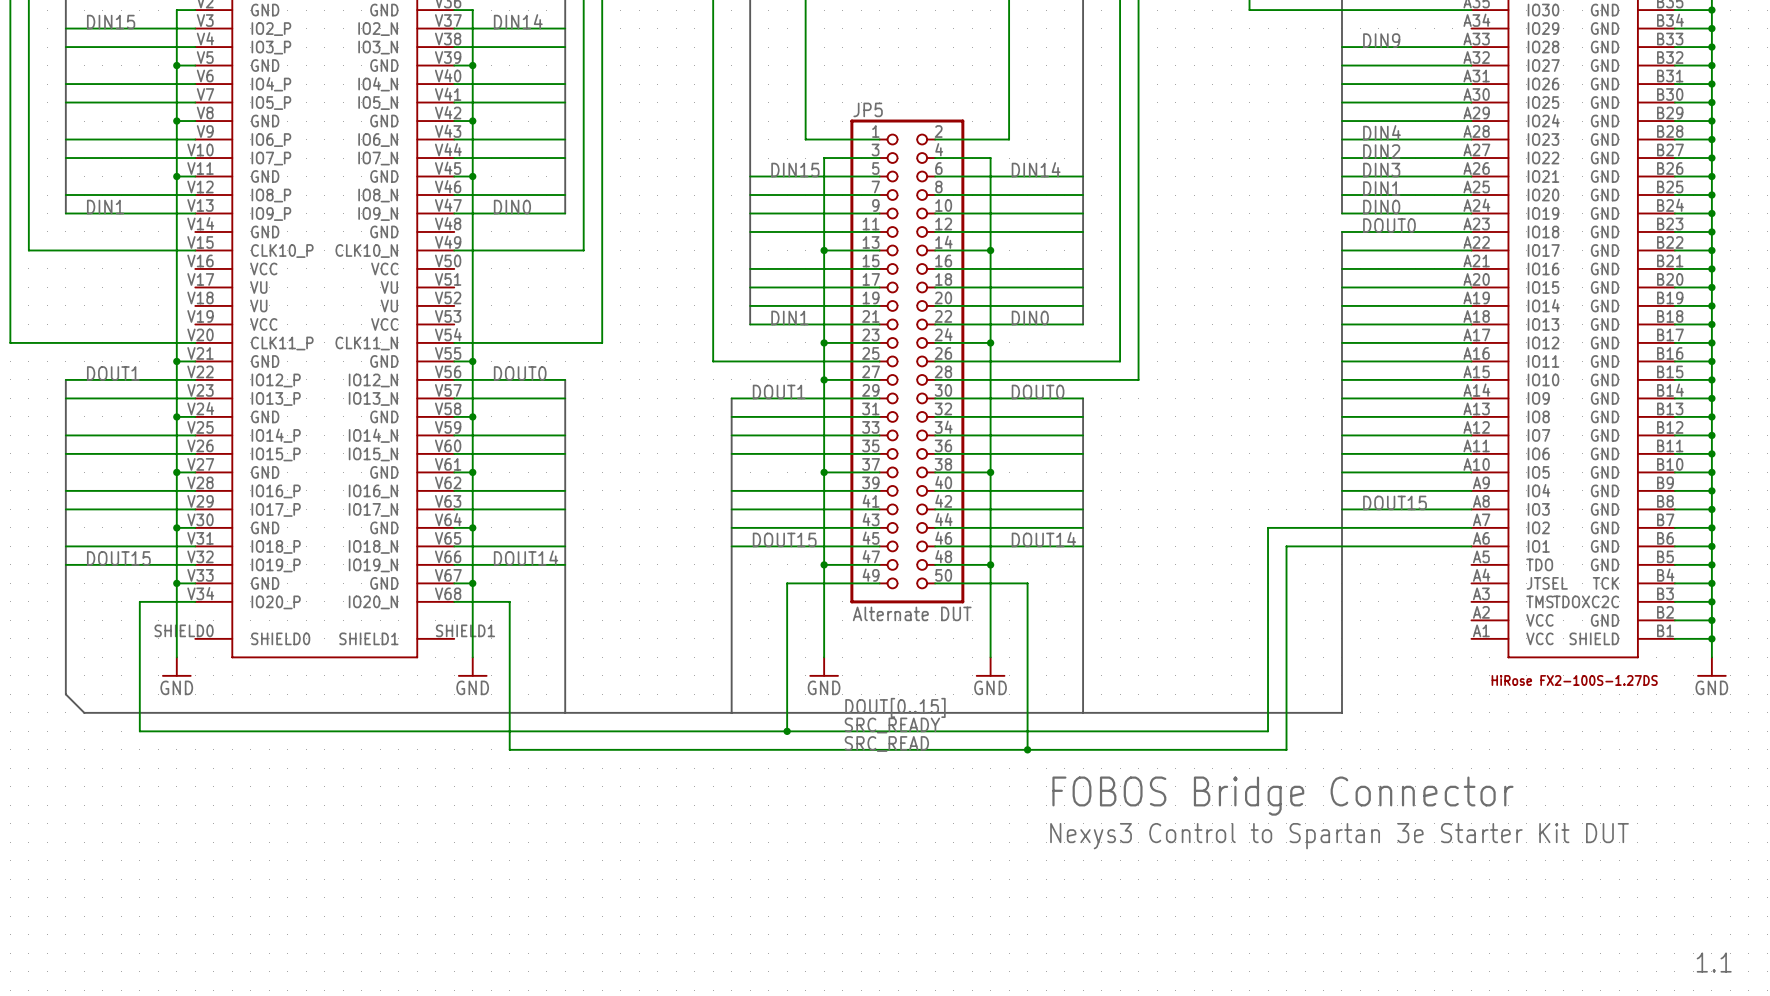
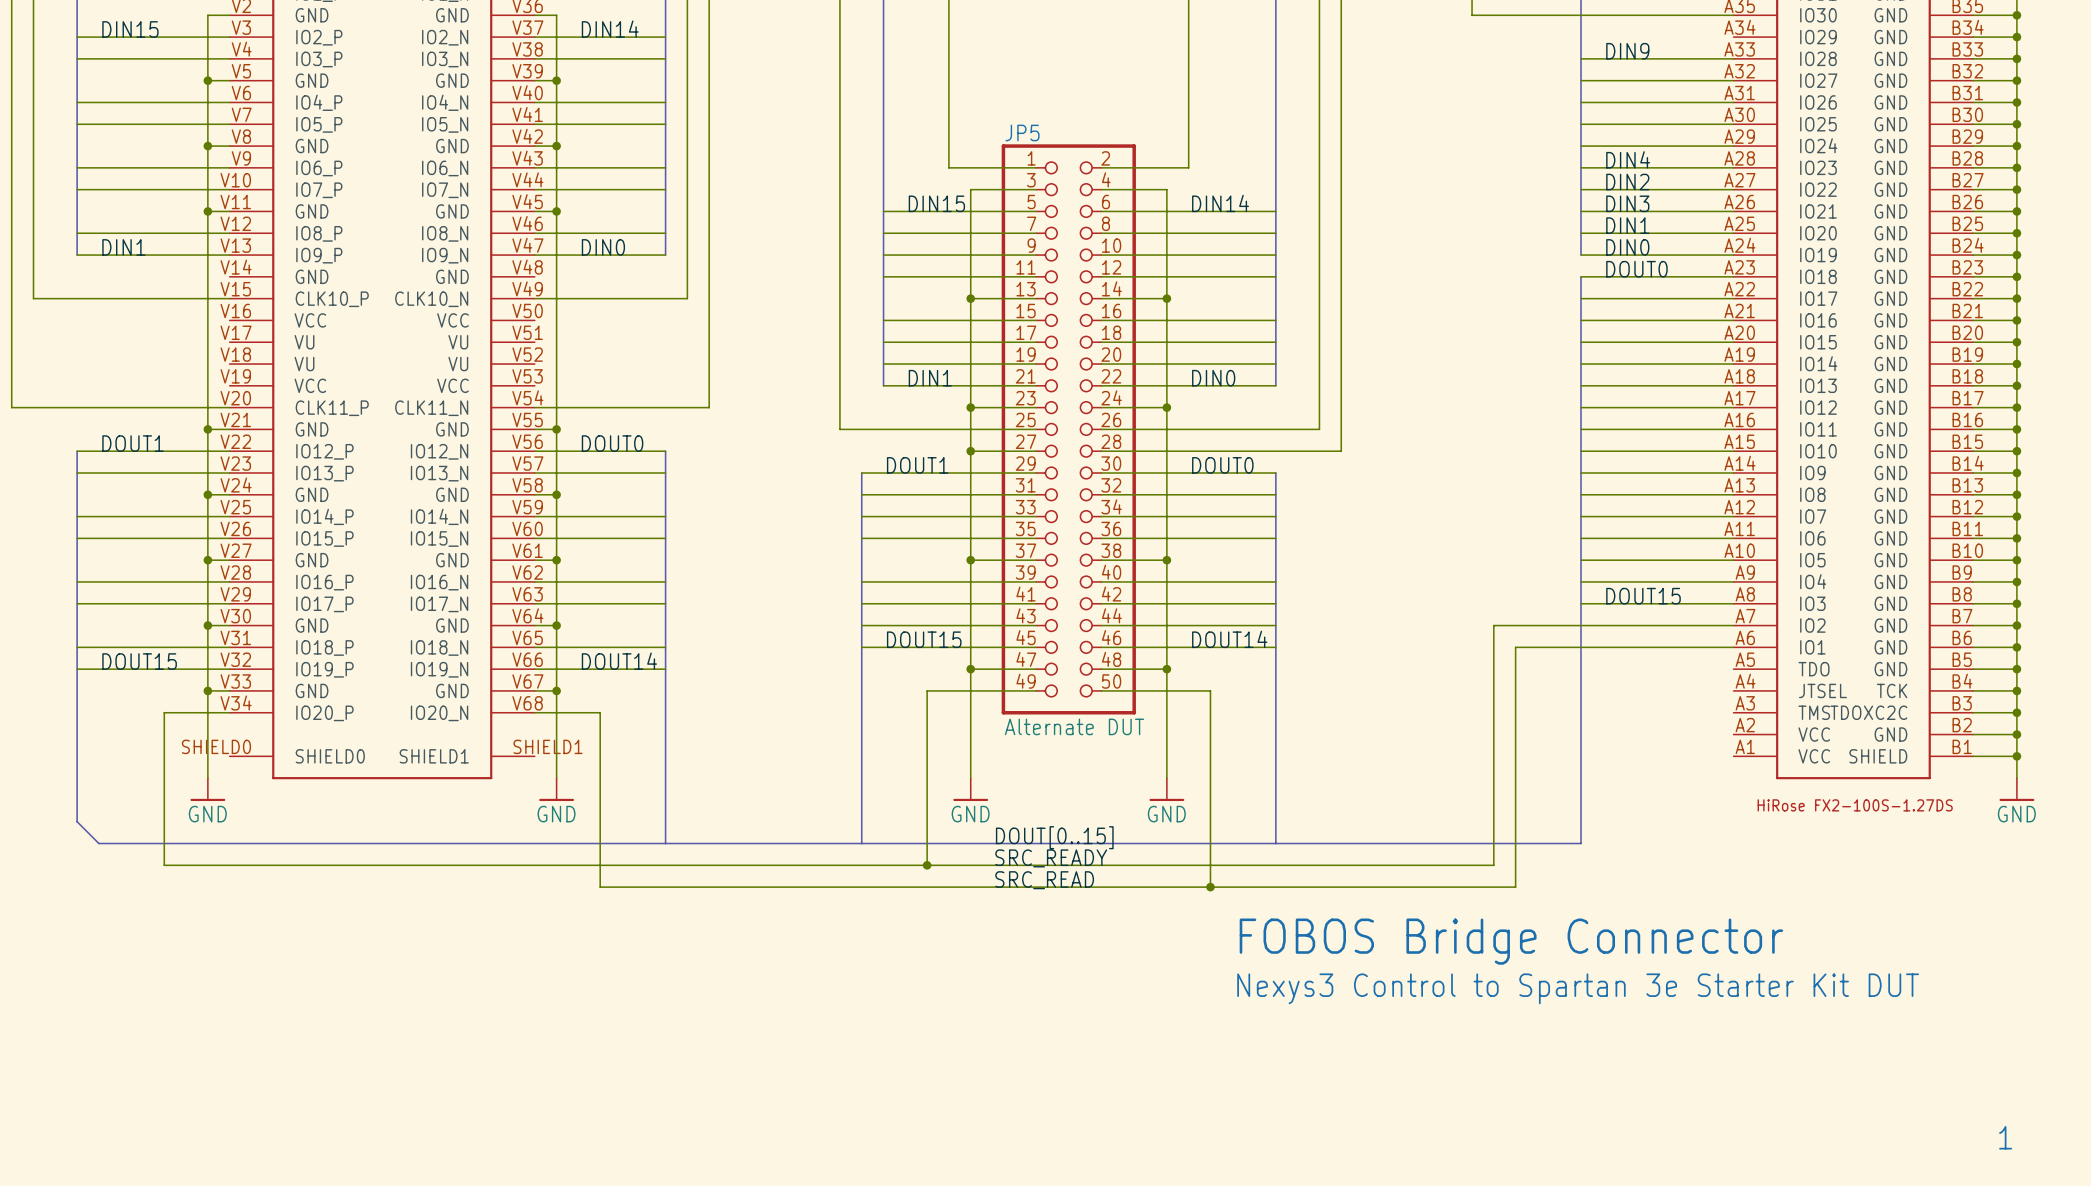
text: 1.1 (1714, 962) -> 1 (2005, 1137)

